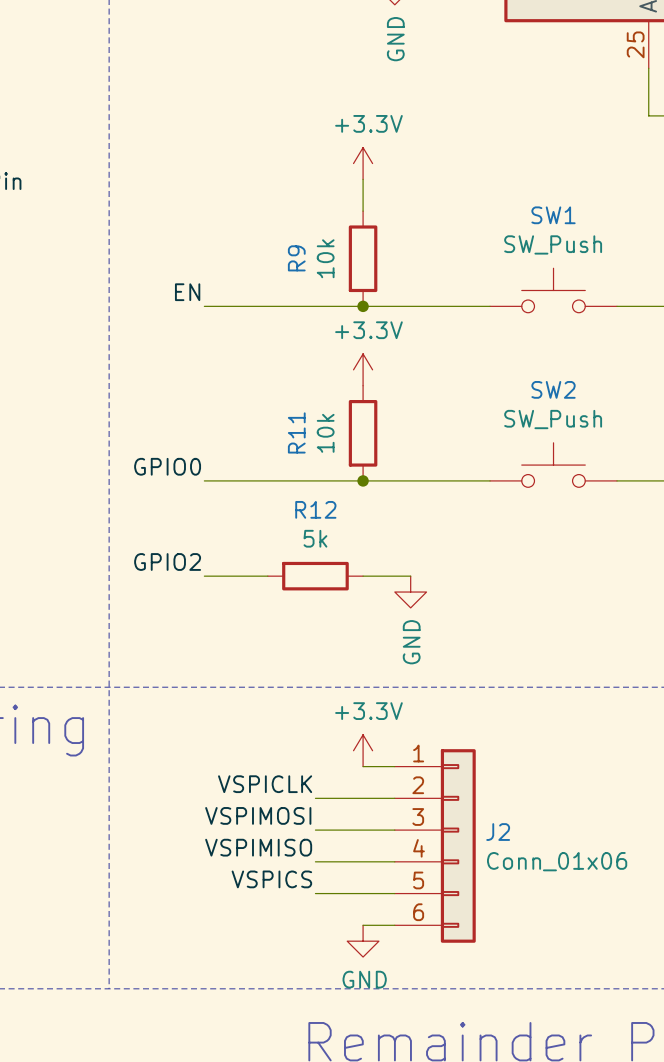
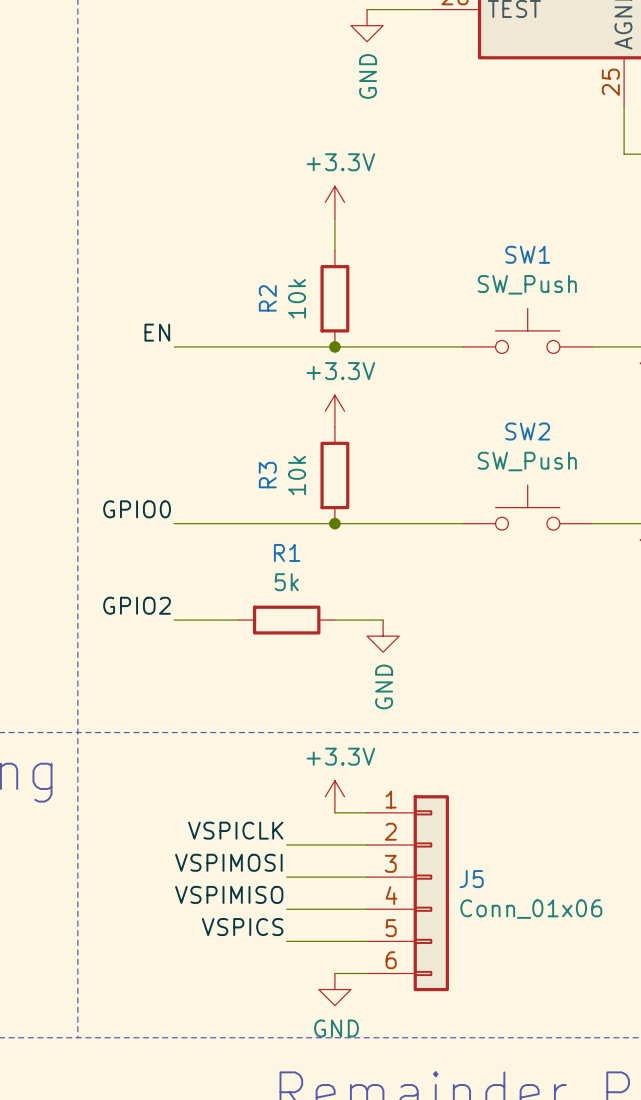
R9 name: R9 (296, 258) -> R2 (267, 298)
R11 name: R11 (296, 432) -> R3 (267, 475)
R12 name: R12 (315, 509) -> R1 (287, 552)
J2 name: J2 (498, 832) -> J5 (471, 879)

